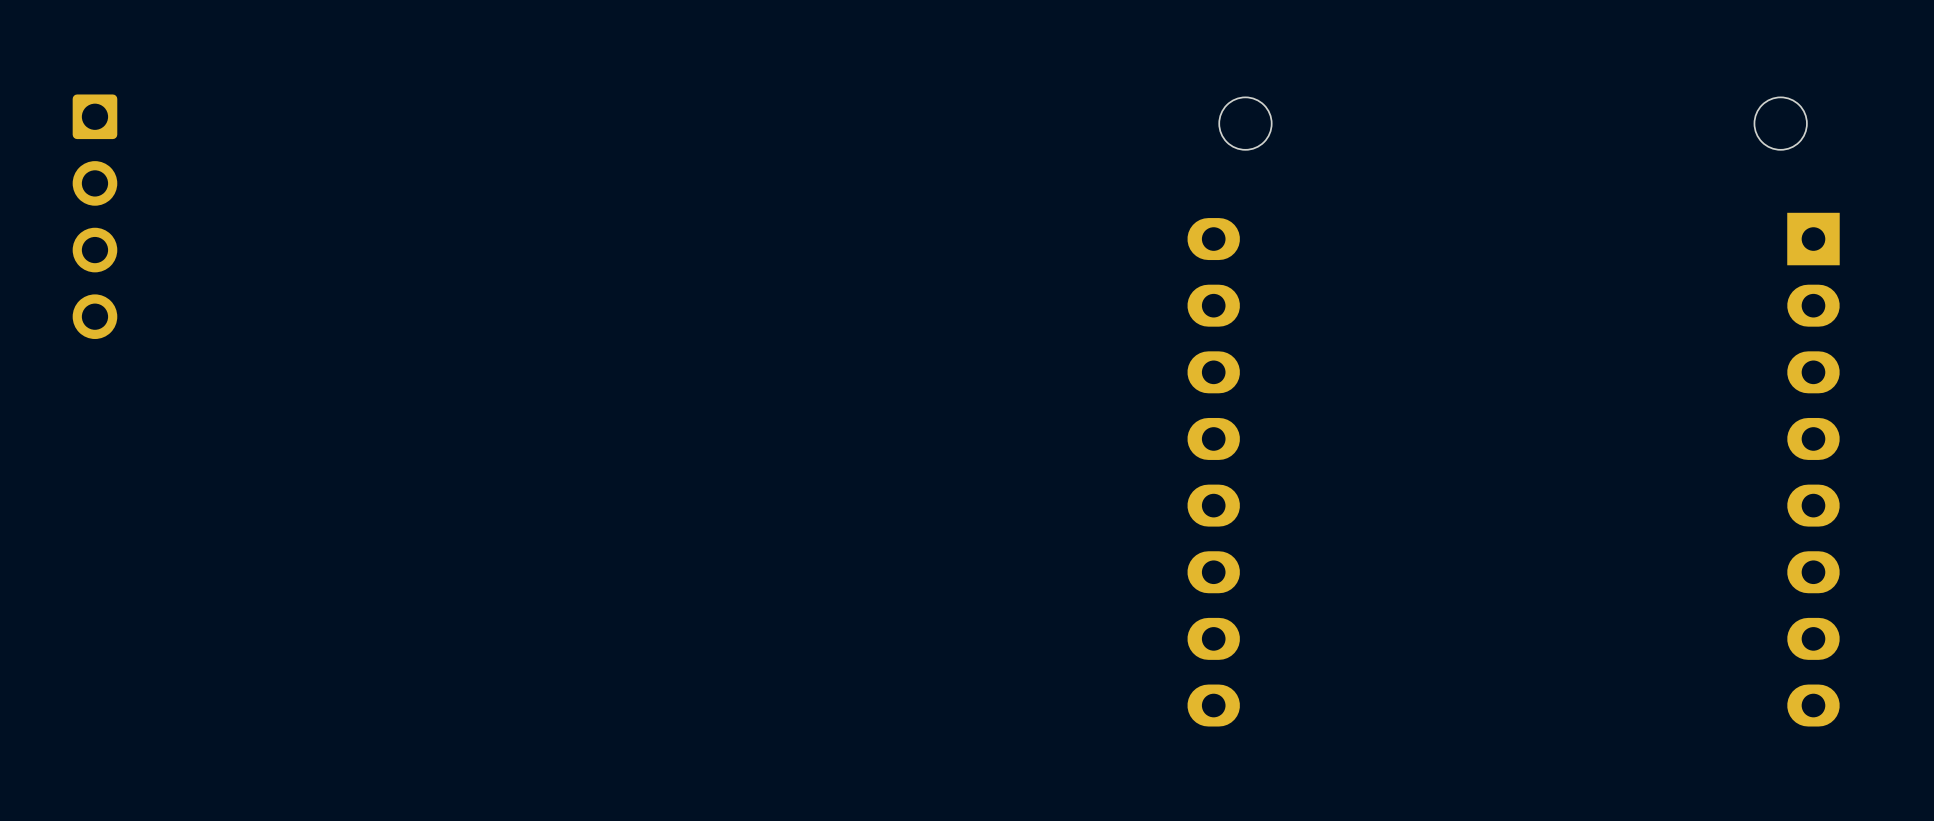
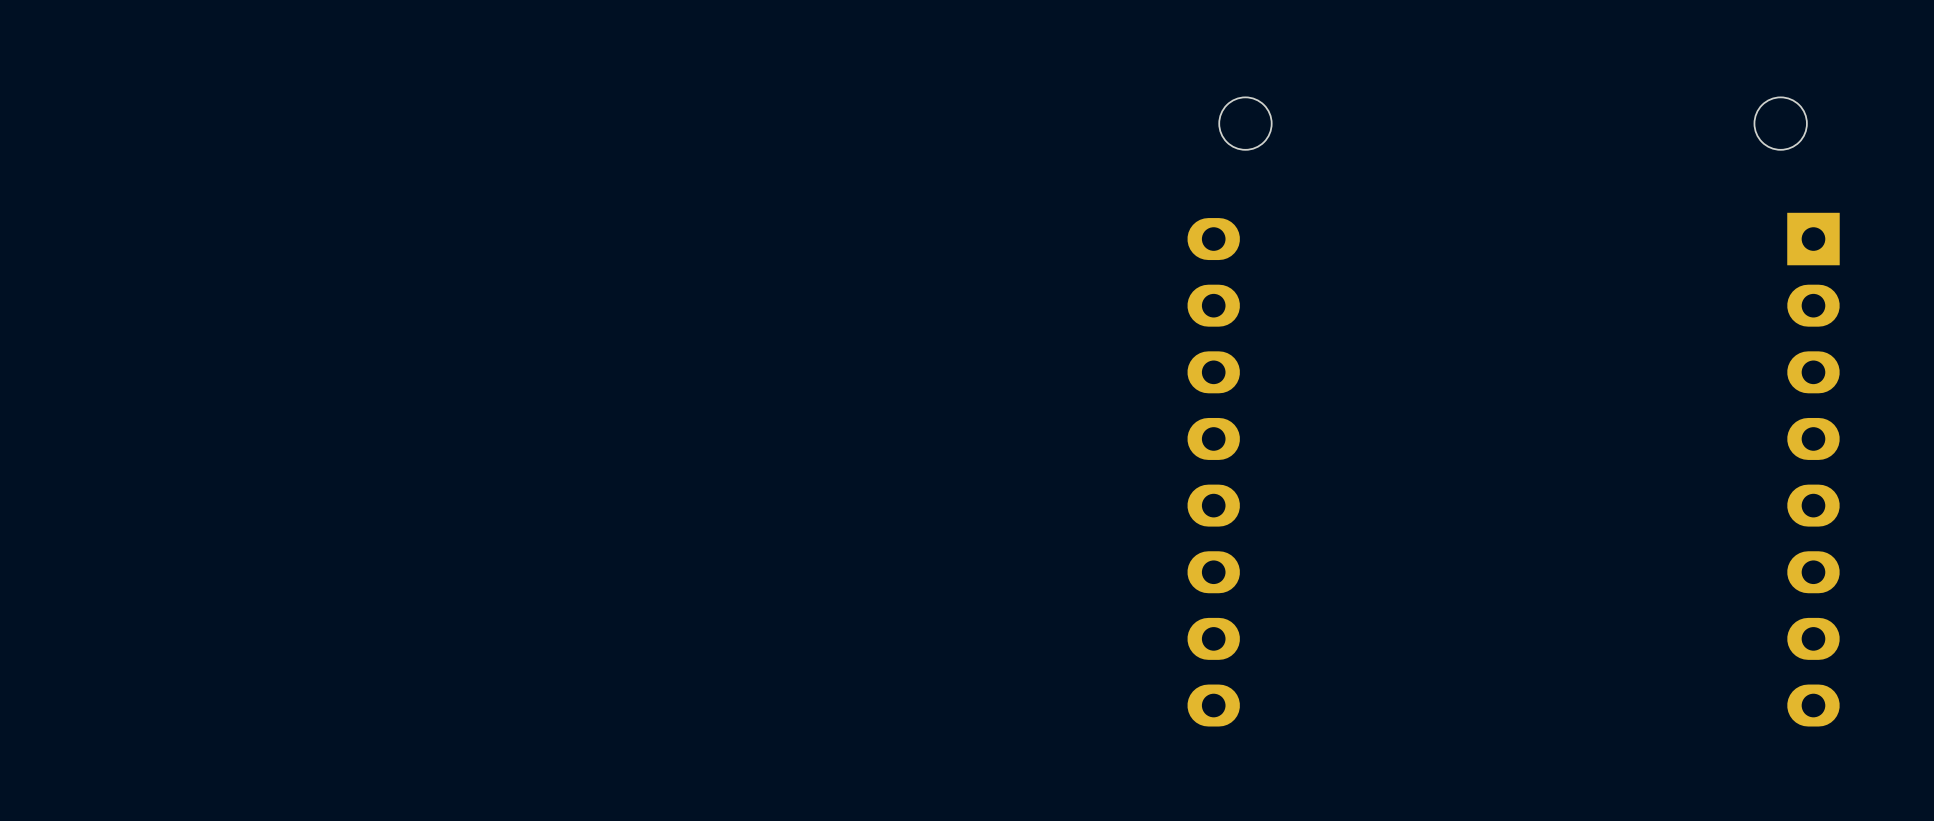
part: (94, 216) -> none

